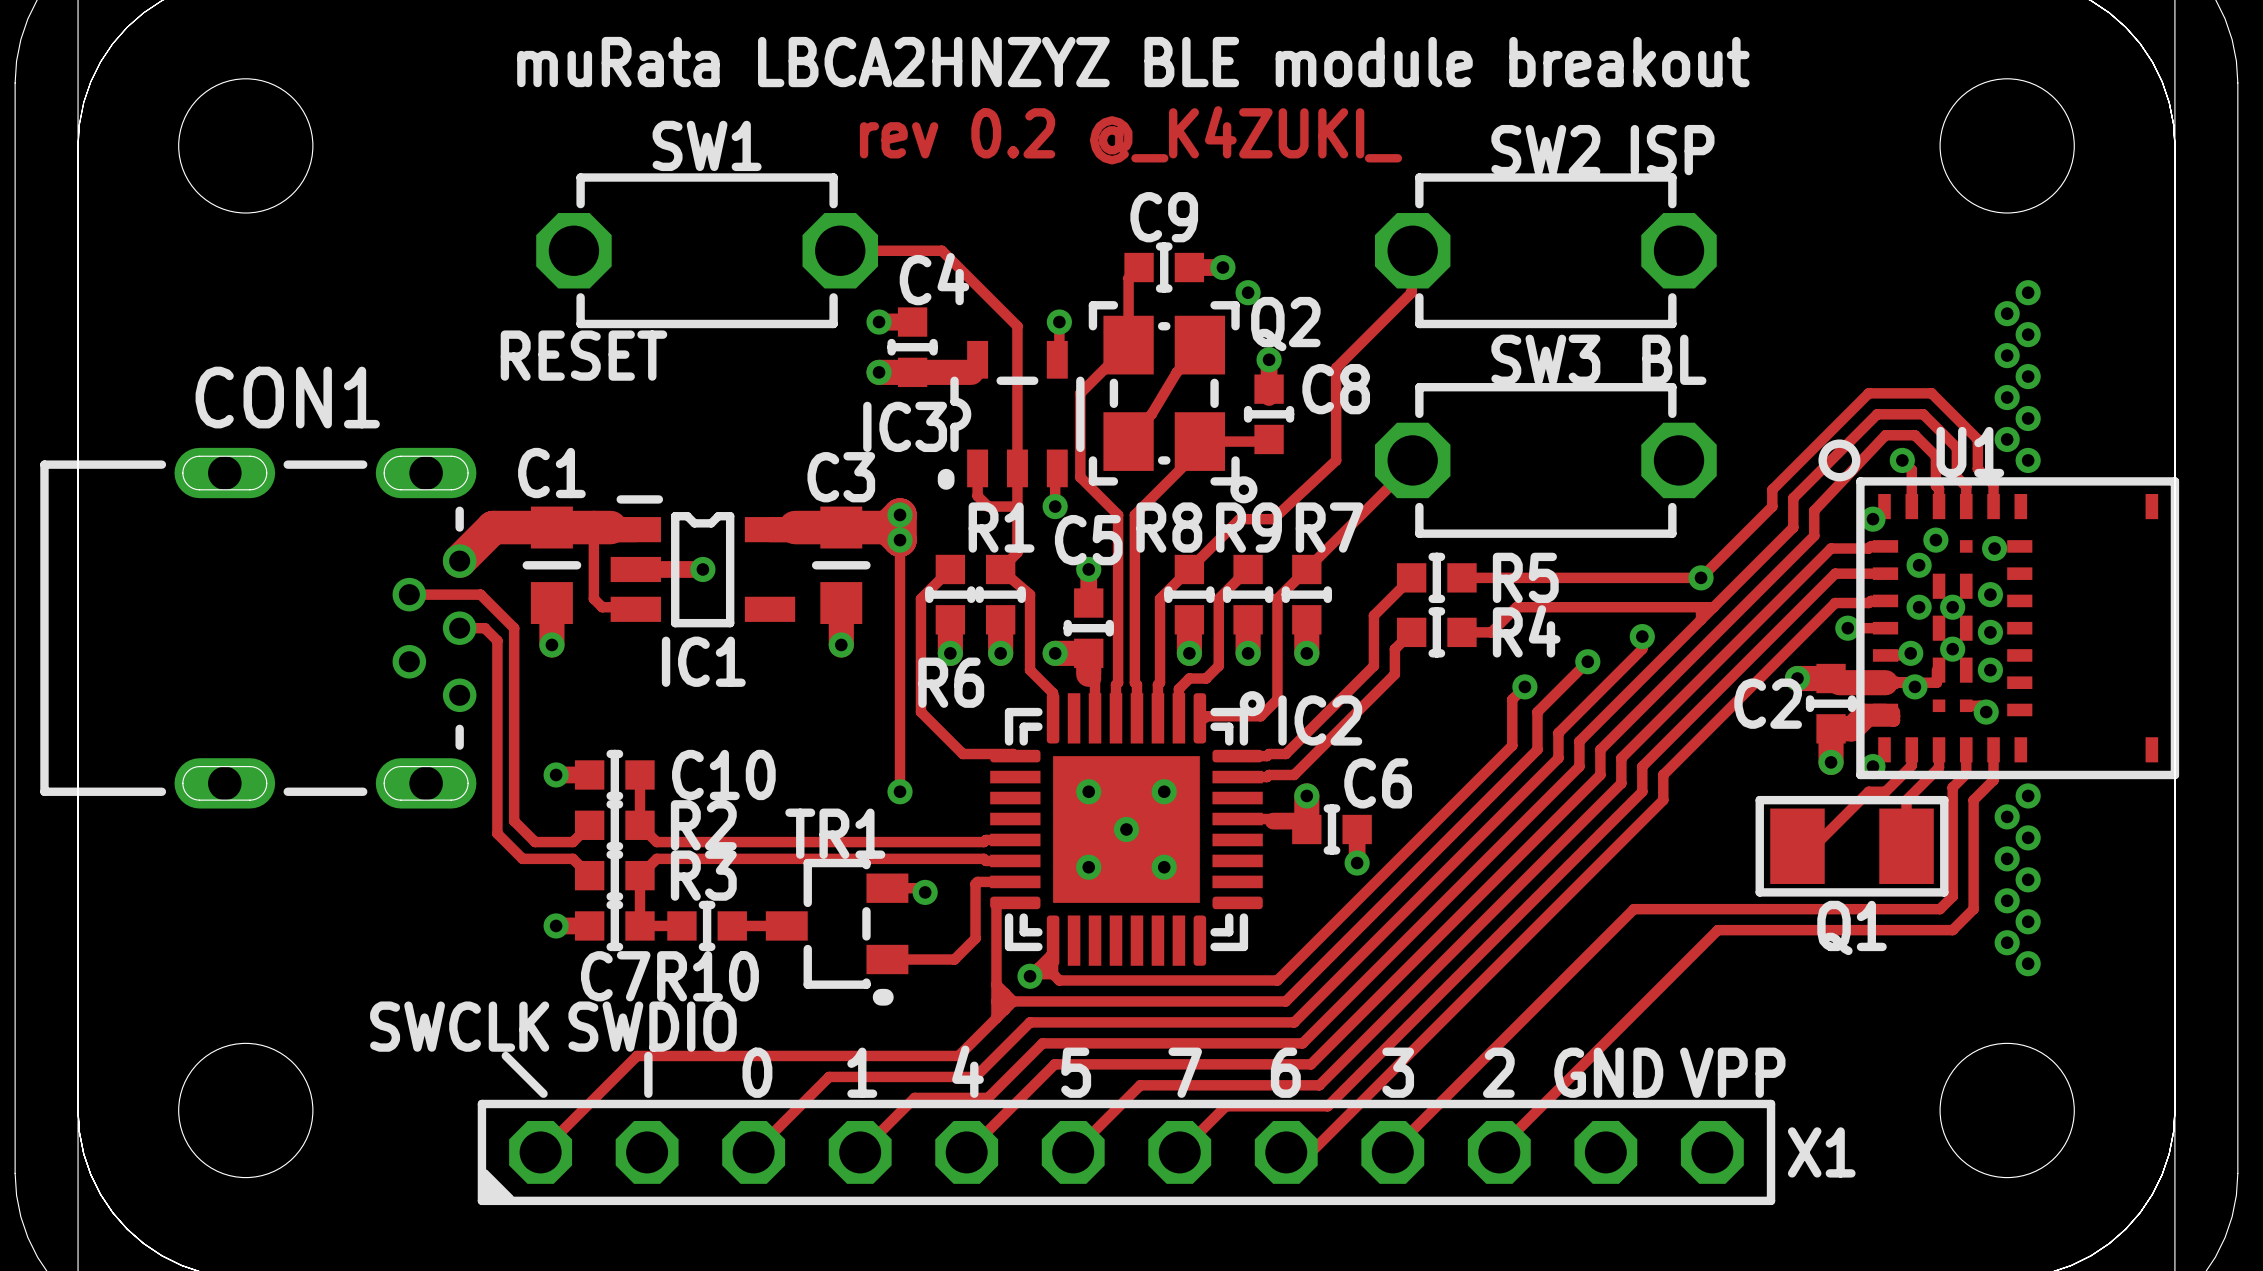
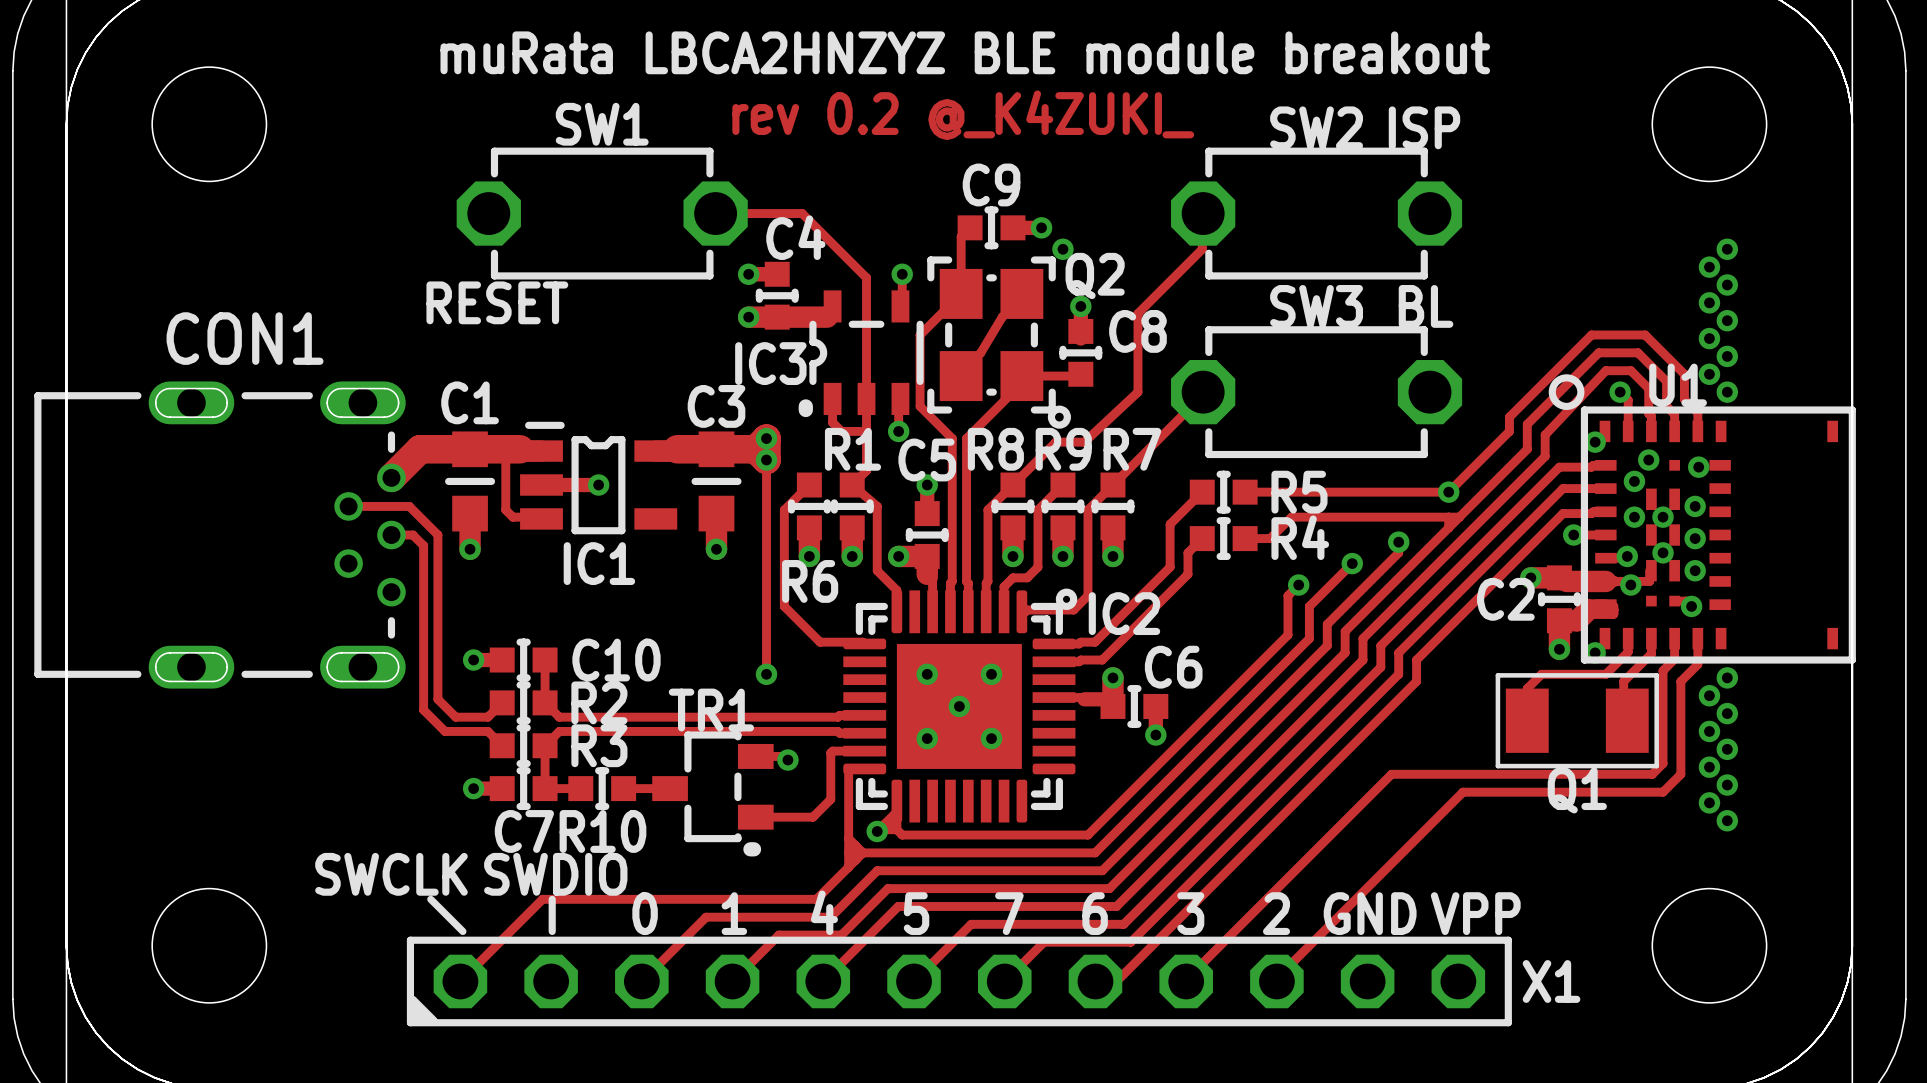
track: (1868, 791) (1814, 846) (1797, 846) -> (1591, 674) (1541, 674) (1527, 688) (1527, 720)
Q1 footprint: [1755, 795, 1949, 897] -> [1495, 673, 1659, 769]

